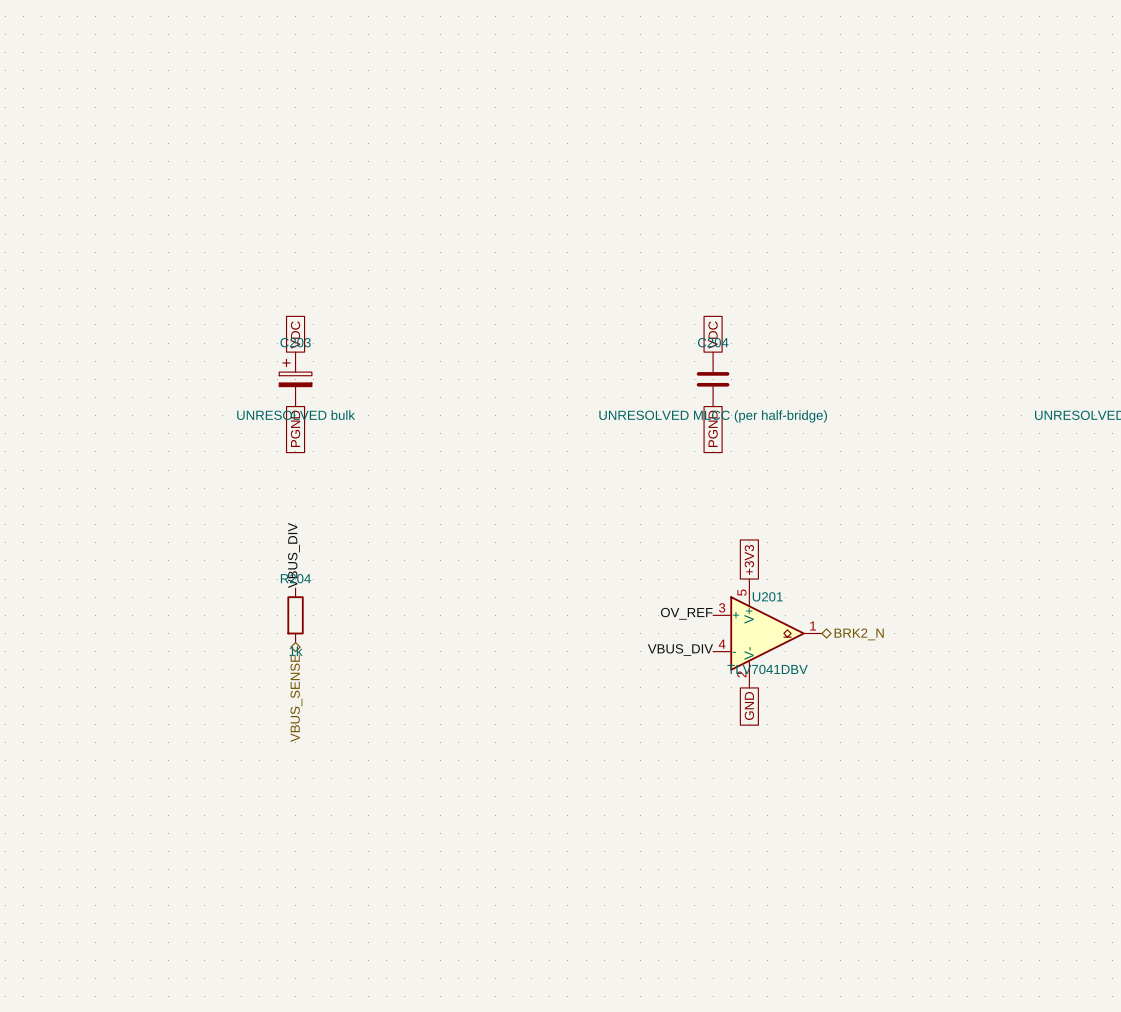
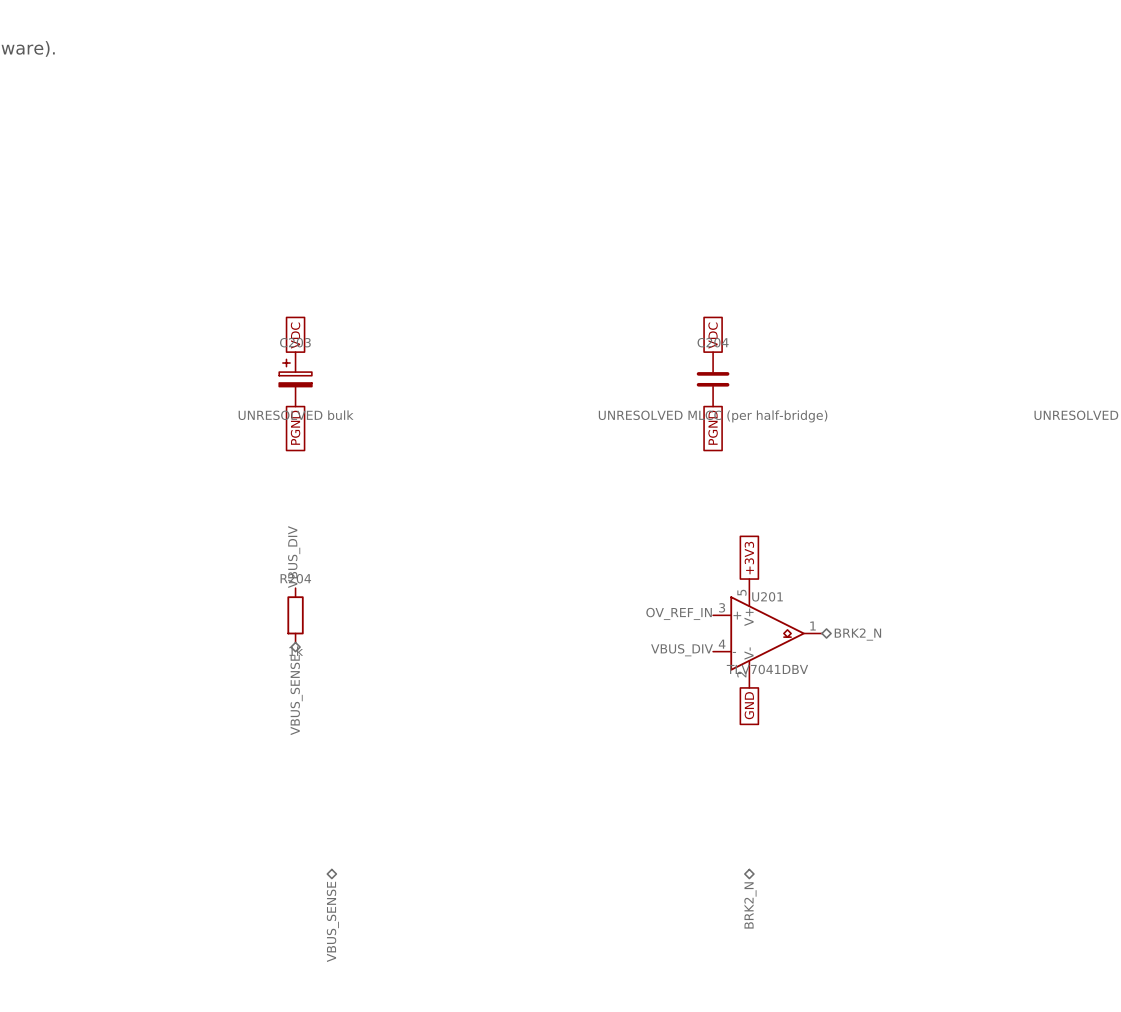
label: OV_REF (686, 613) -> OV_REF_IN (679, 613)
hierarchical label: none -> BRK2_N (750, 905)
hierarchical label: none -> VBUS_SENSE (332, 921)

